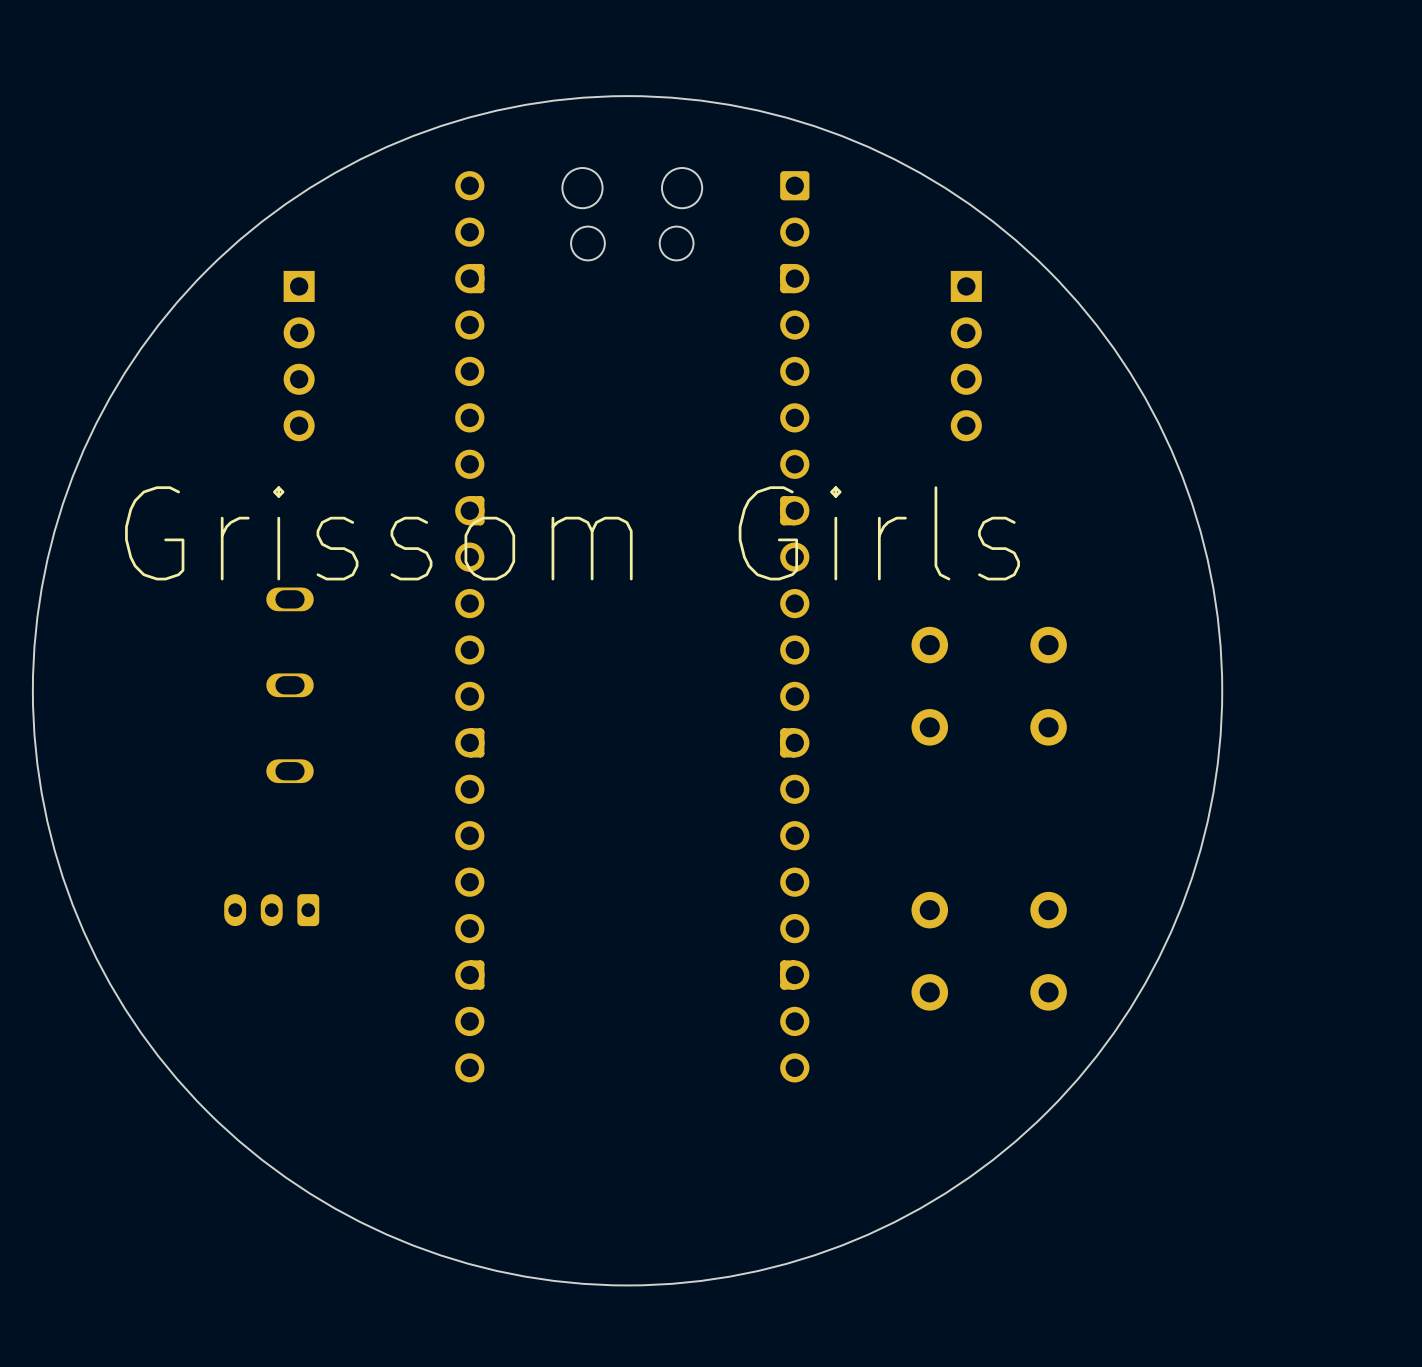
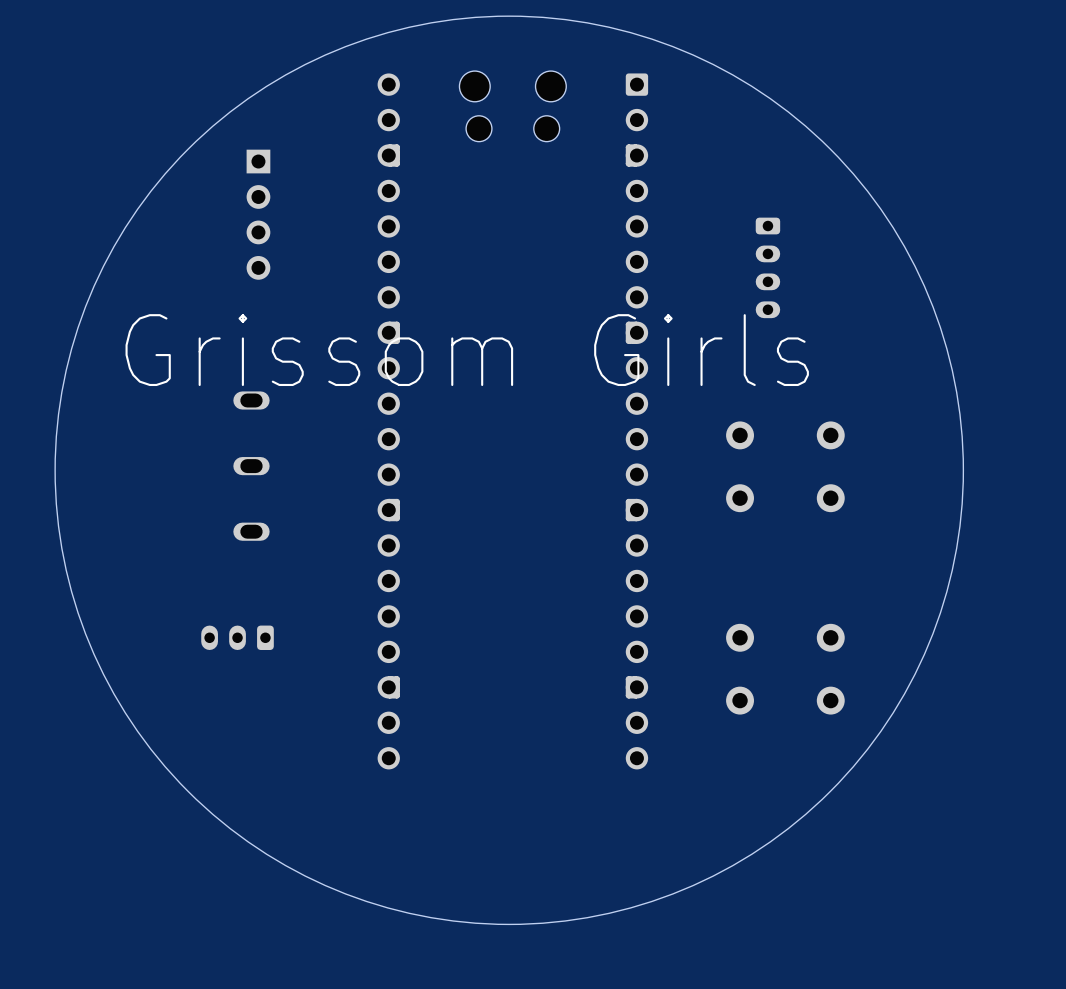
part: (966, 356) -> none
part: none -> (767, 267)

